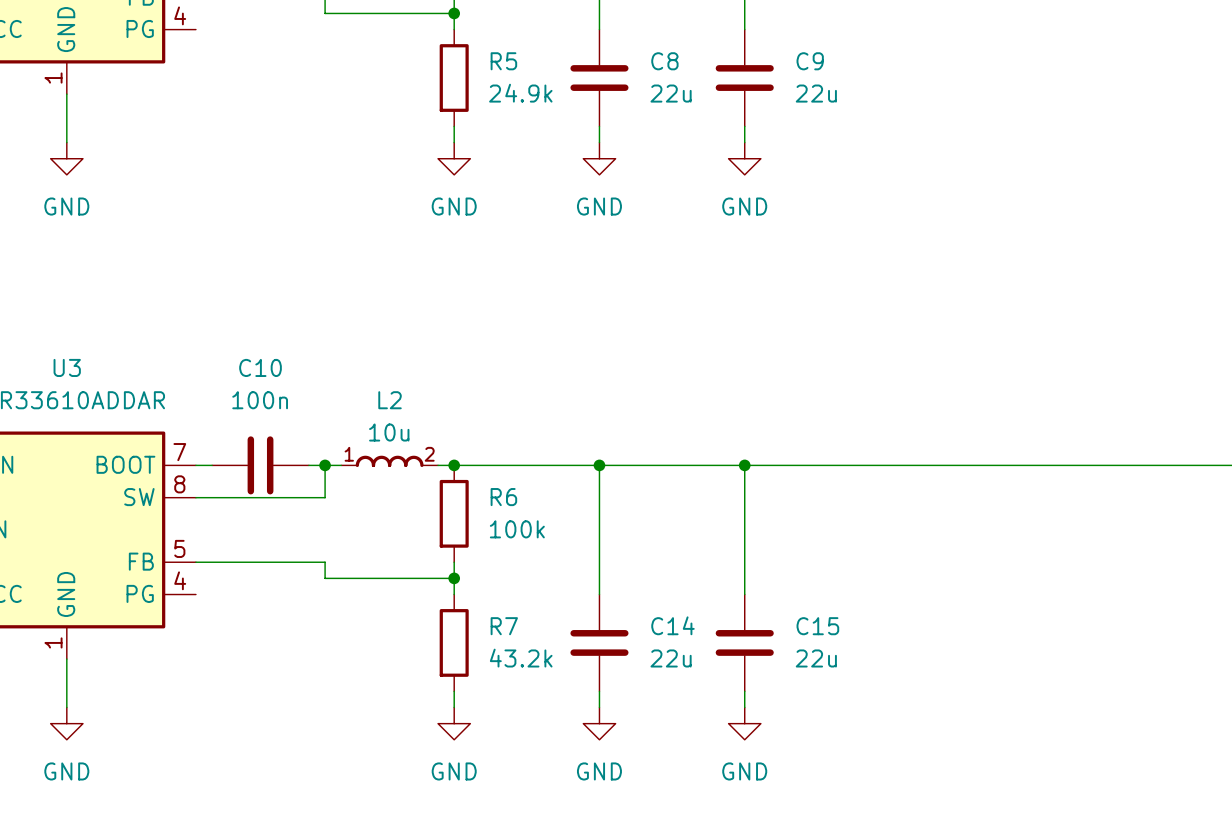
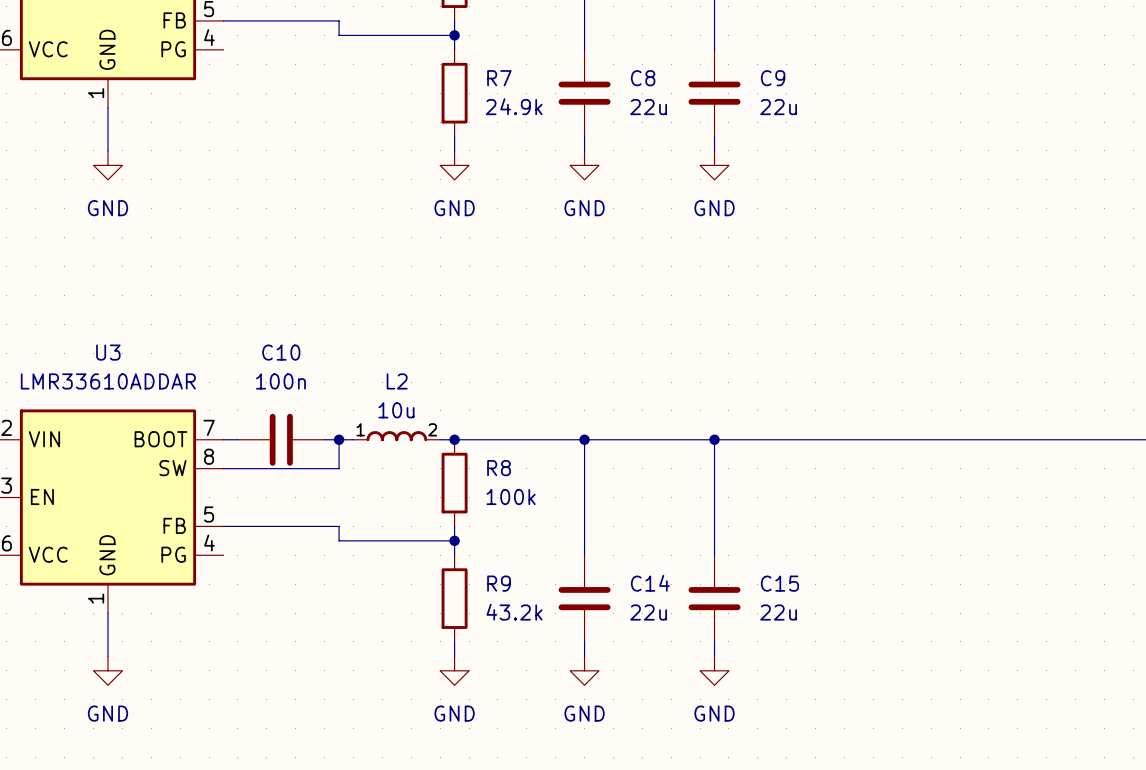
R5 name: R5 (503, 61) -> R7 (499, 78)
R6 name: R6 (503, 497) -> R8 (499, 468)
R7 name: R7 (504, 626) -> R9 (499, 583)

